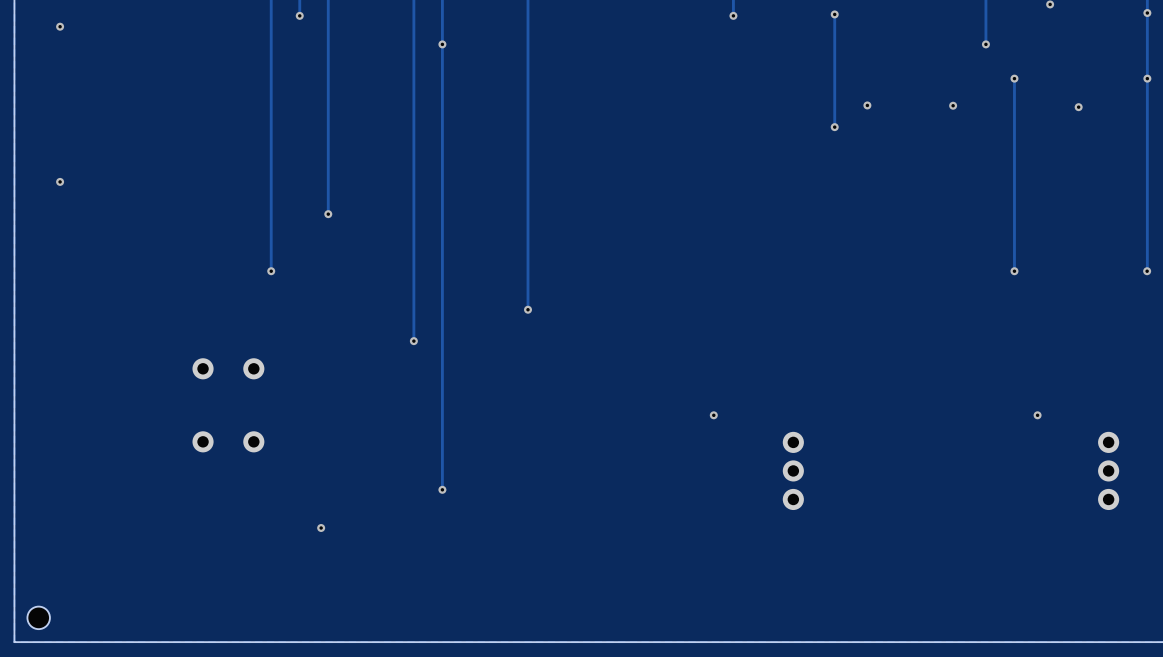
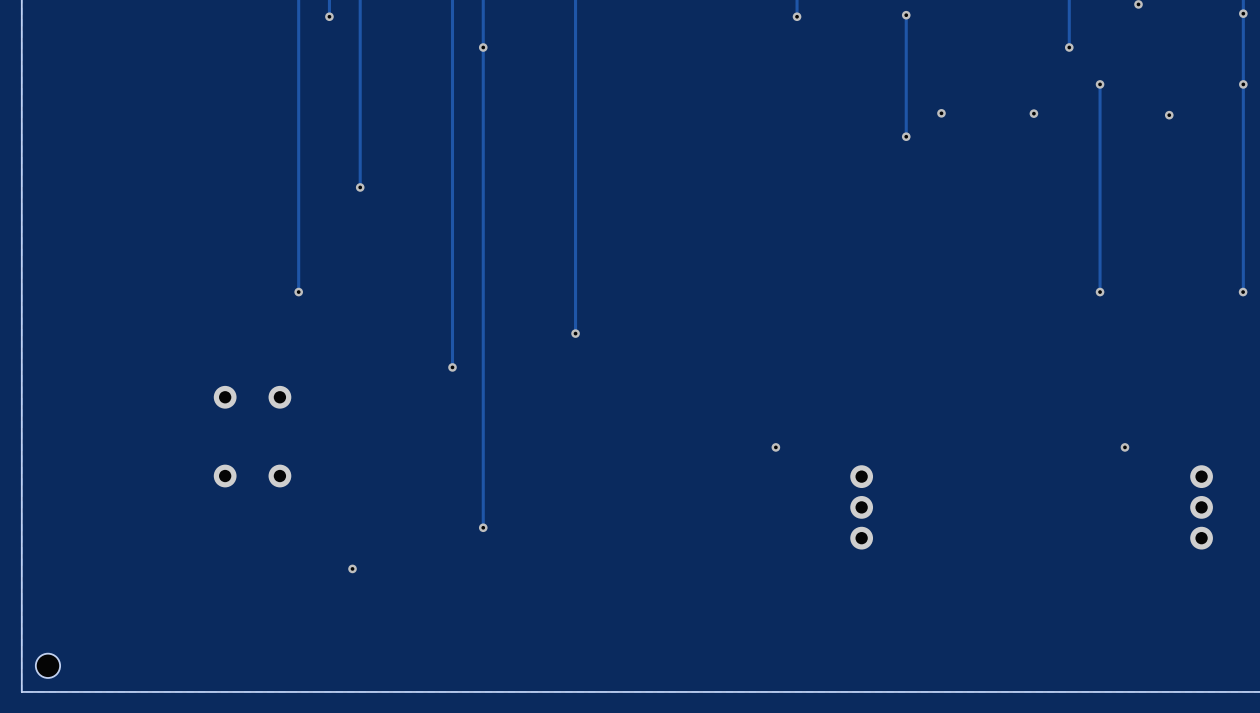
via: (60, 26) -> none
track: (328, 174) (328, 214) -> none
via: (60, 181) -> none
via position: (328, 214) -> (360, 187)

